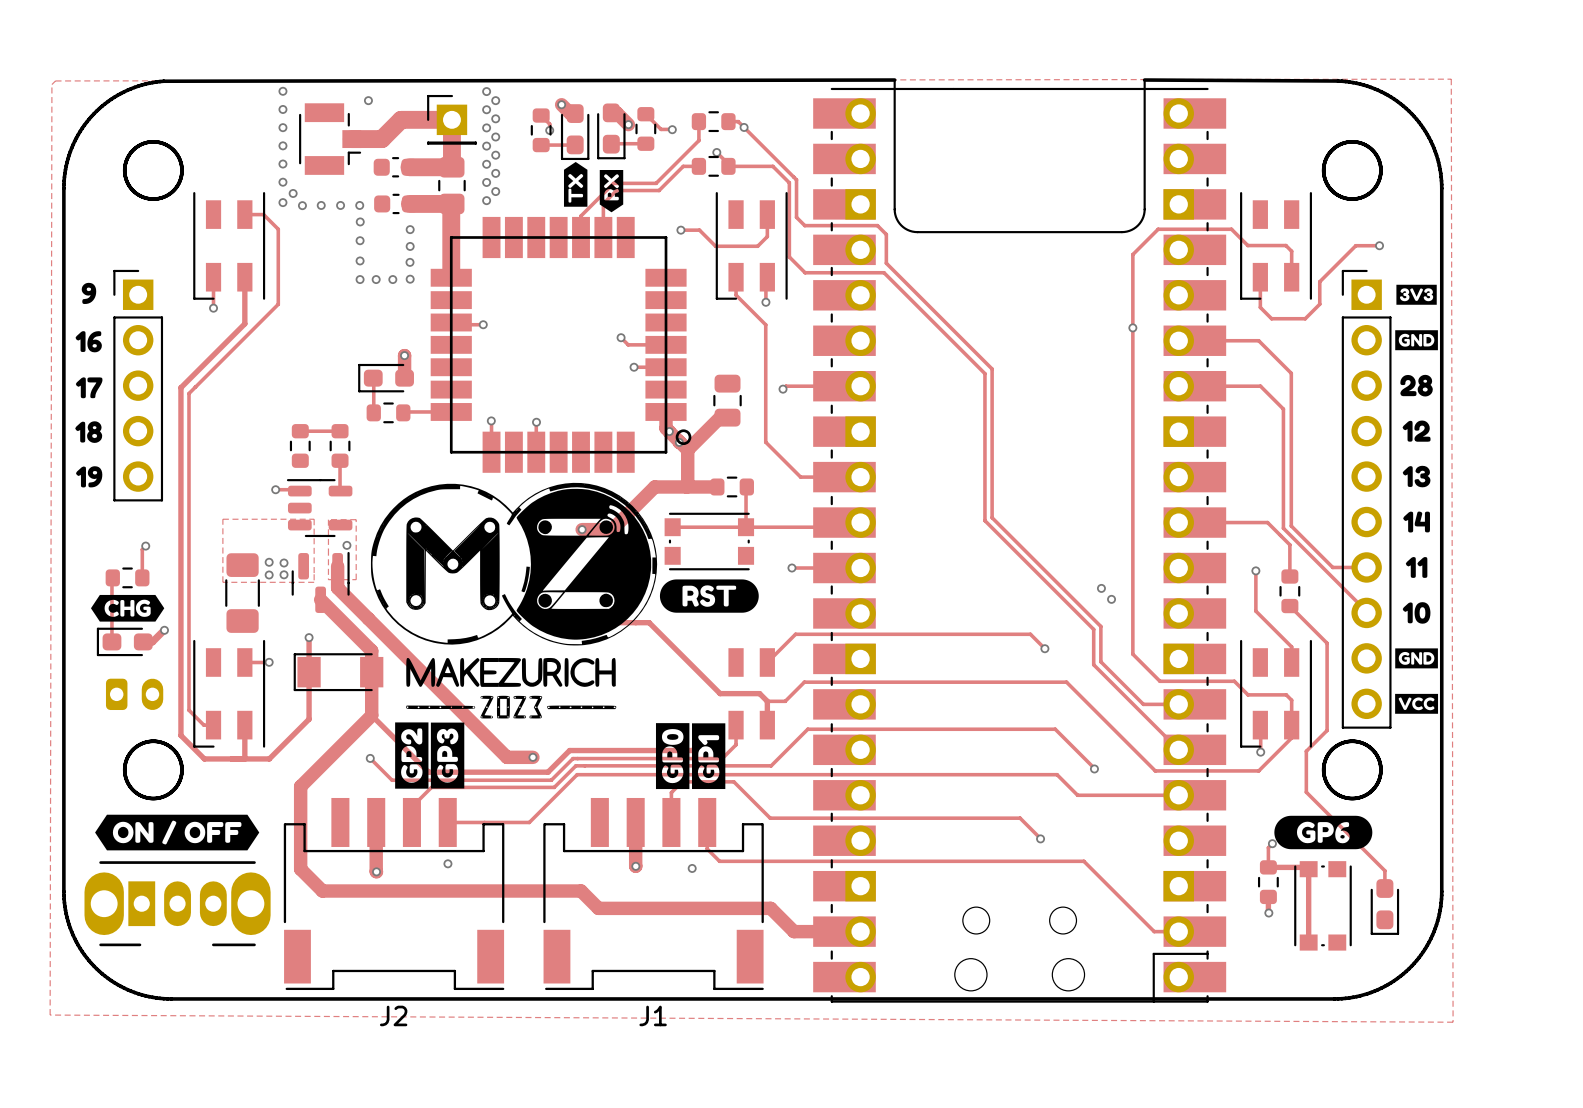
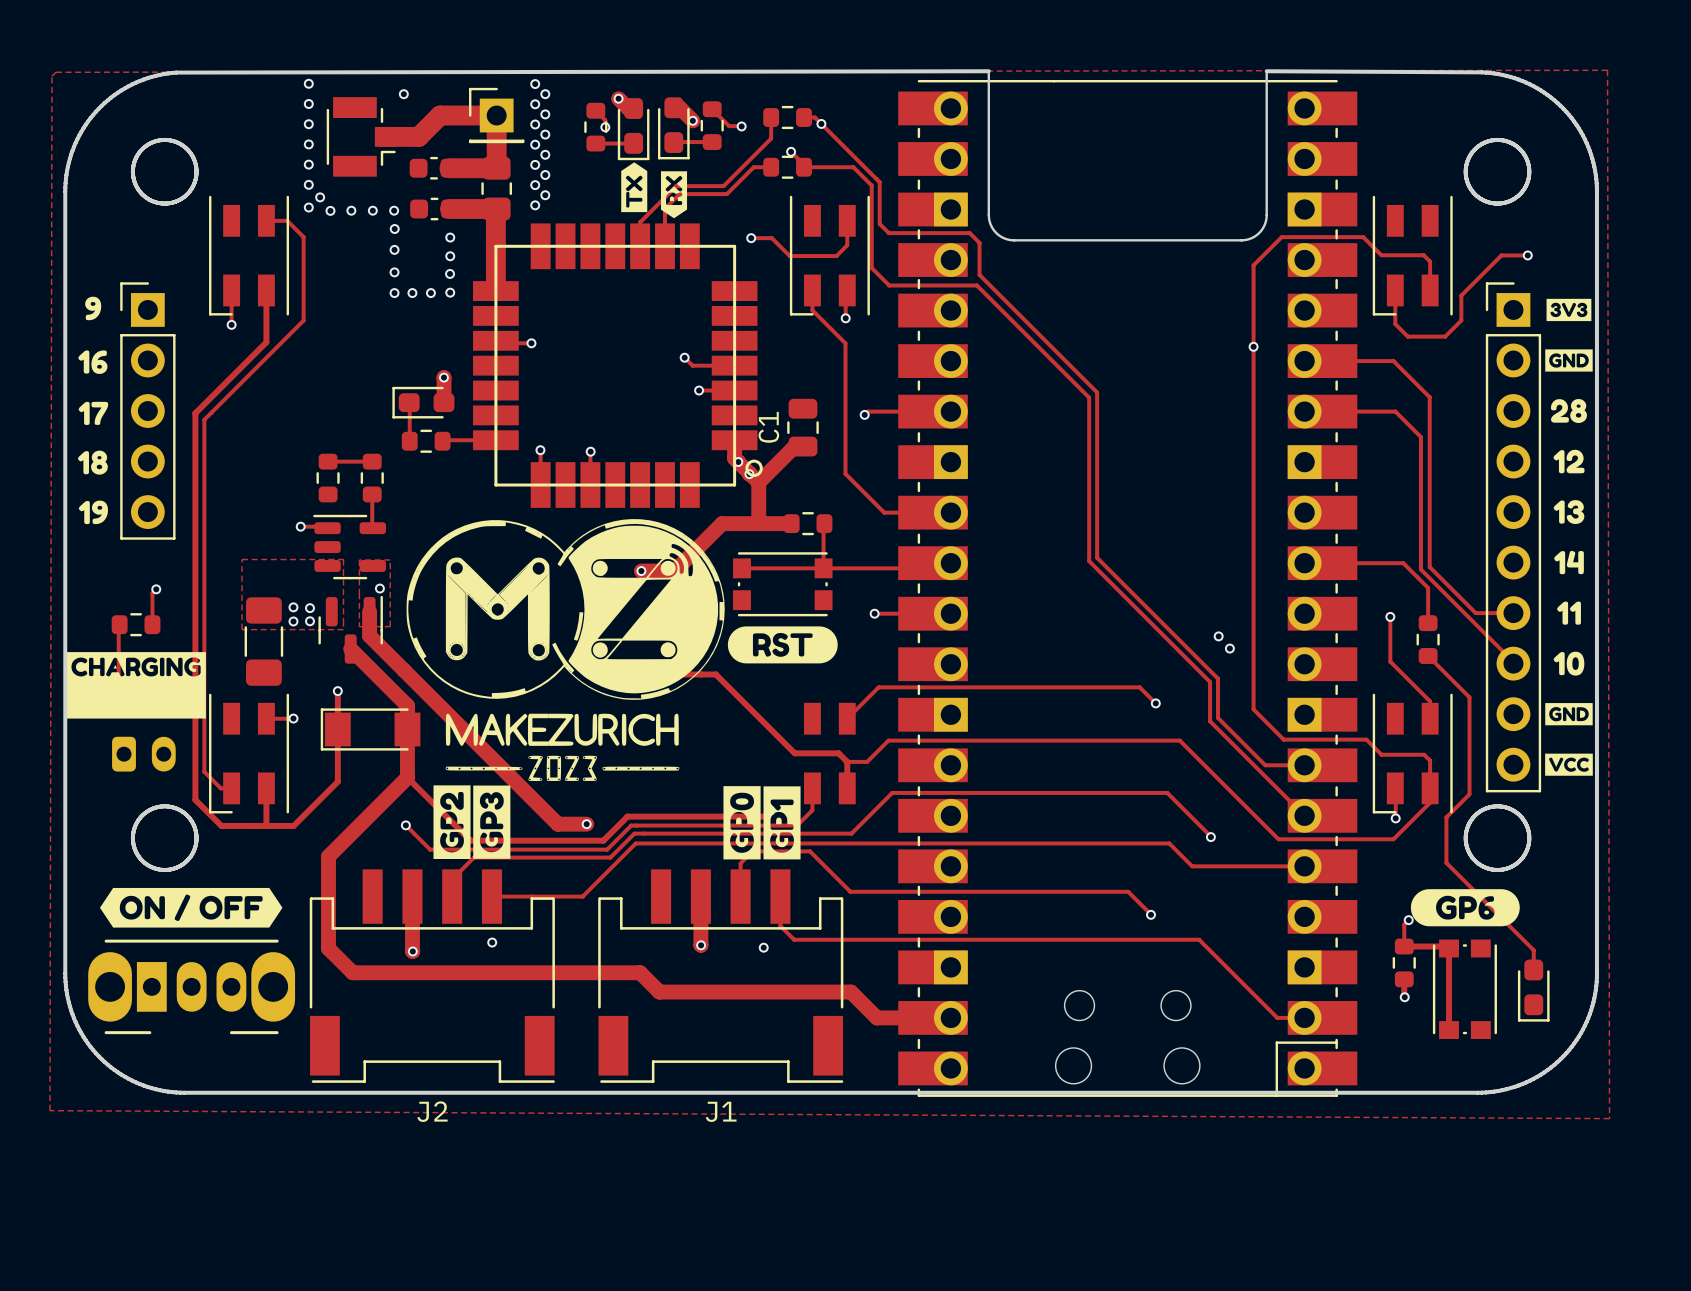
C1 name: none -> C1 (768, 427)
drawing: [90, 594, 165, 622] -> none
drawing: none -> [66, 652, 206, 719]

